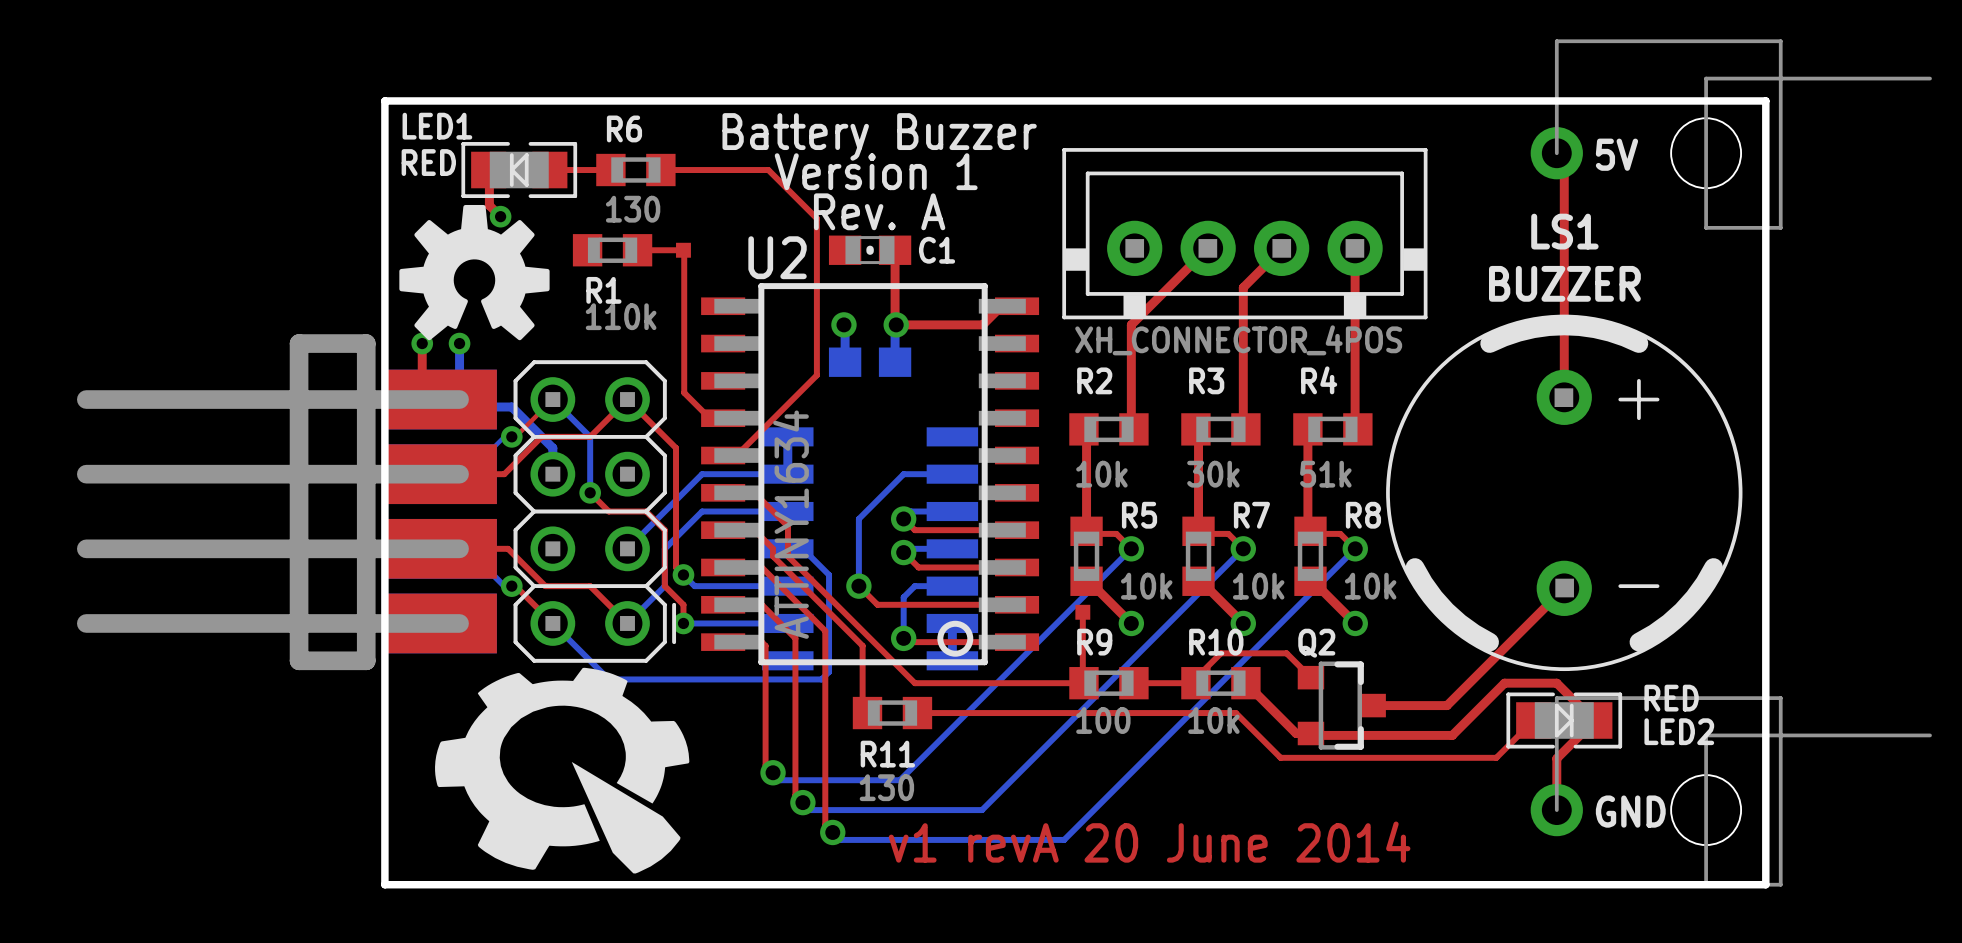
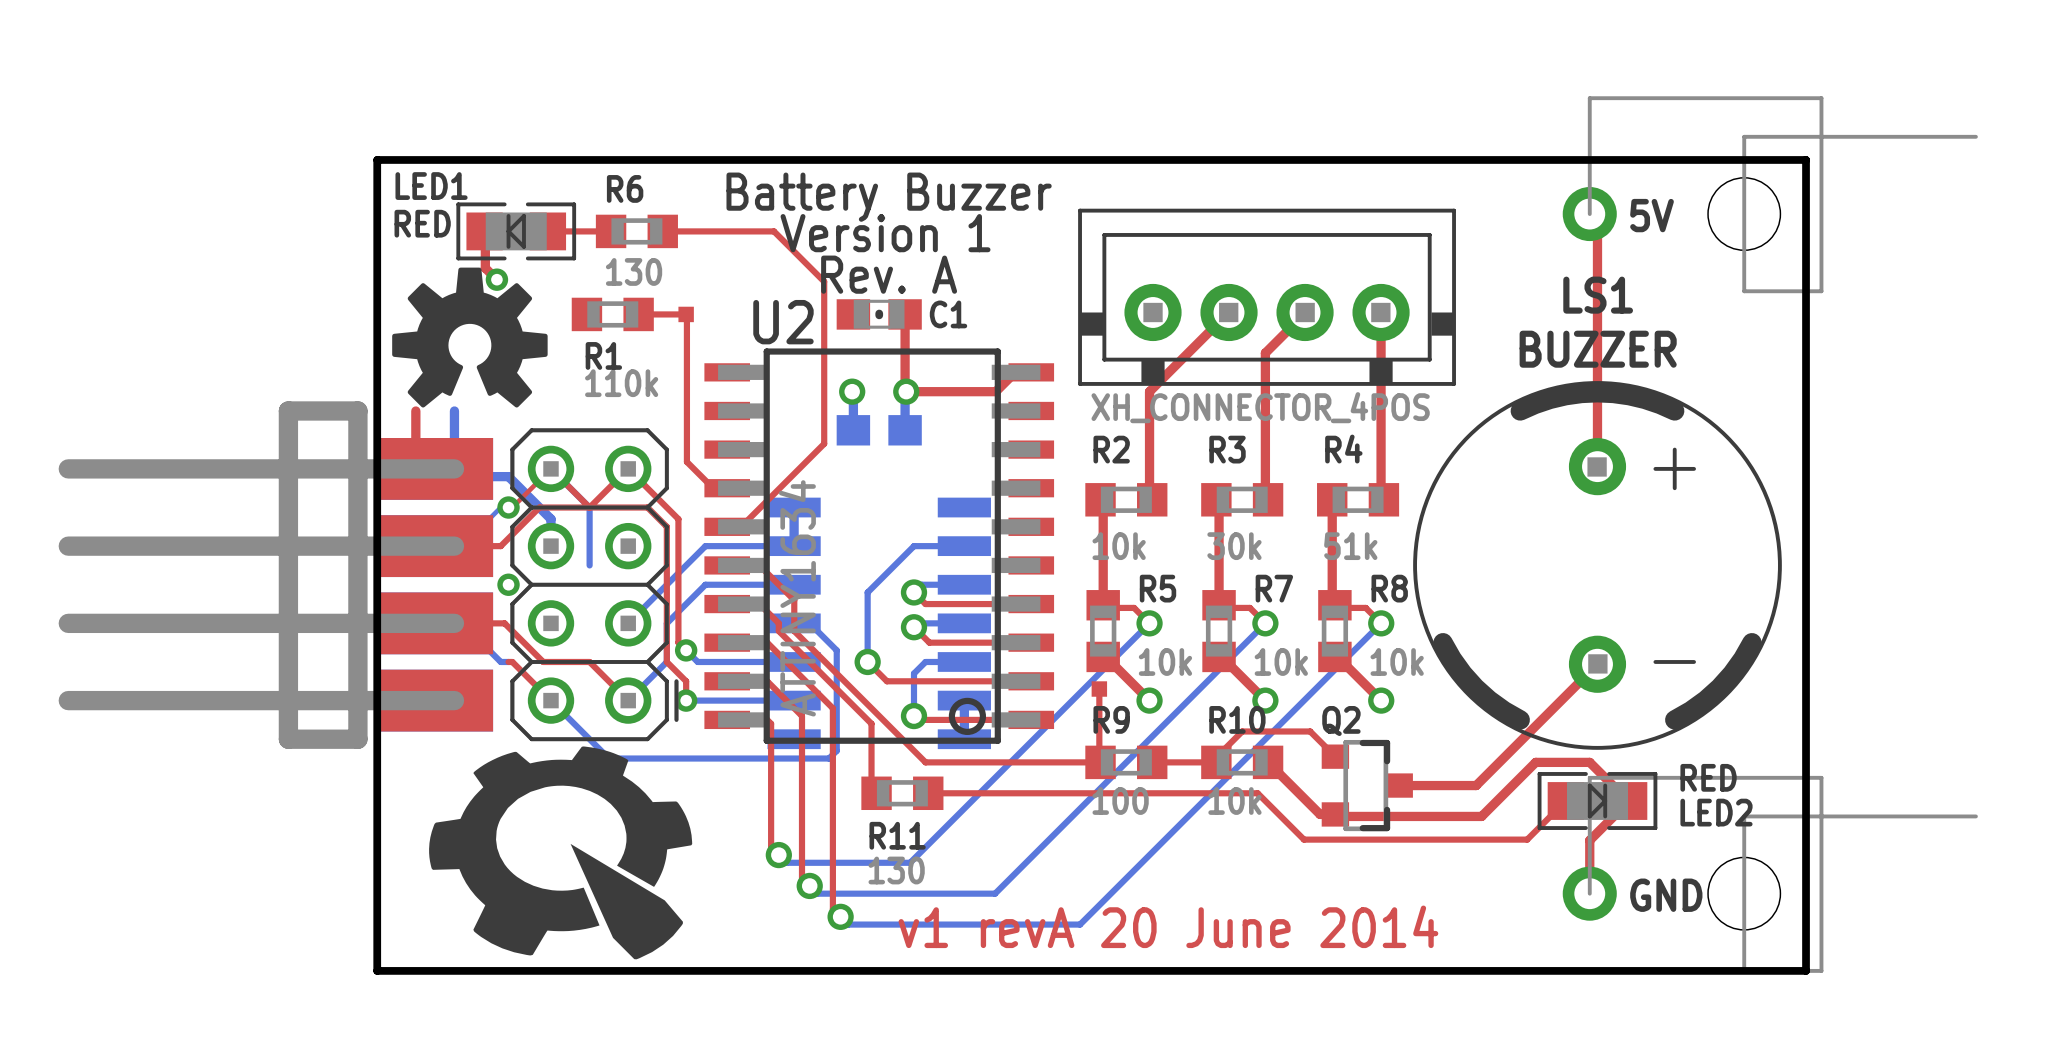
via: (422, 343) -> none
via: (459, 343) -> none
top track: (590, 492) (608, 511) (646, 511) (664, 530) -> (551, 468) (589, 507) (647, 507) (666, 526) (666, 604)
via: (590, 492) -> none
via: none -> (508, 584)
via: (511, 586) -> none

